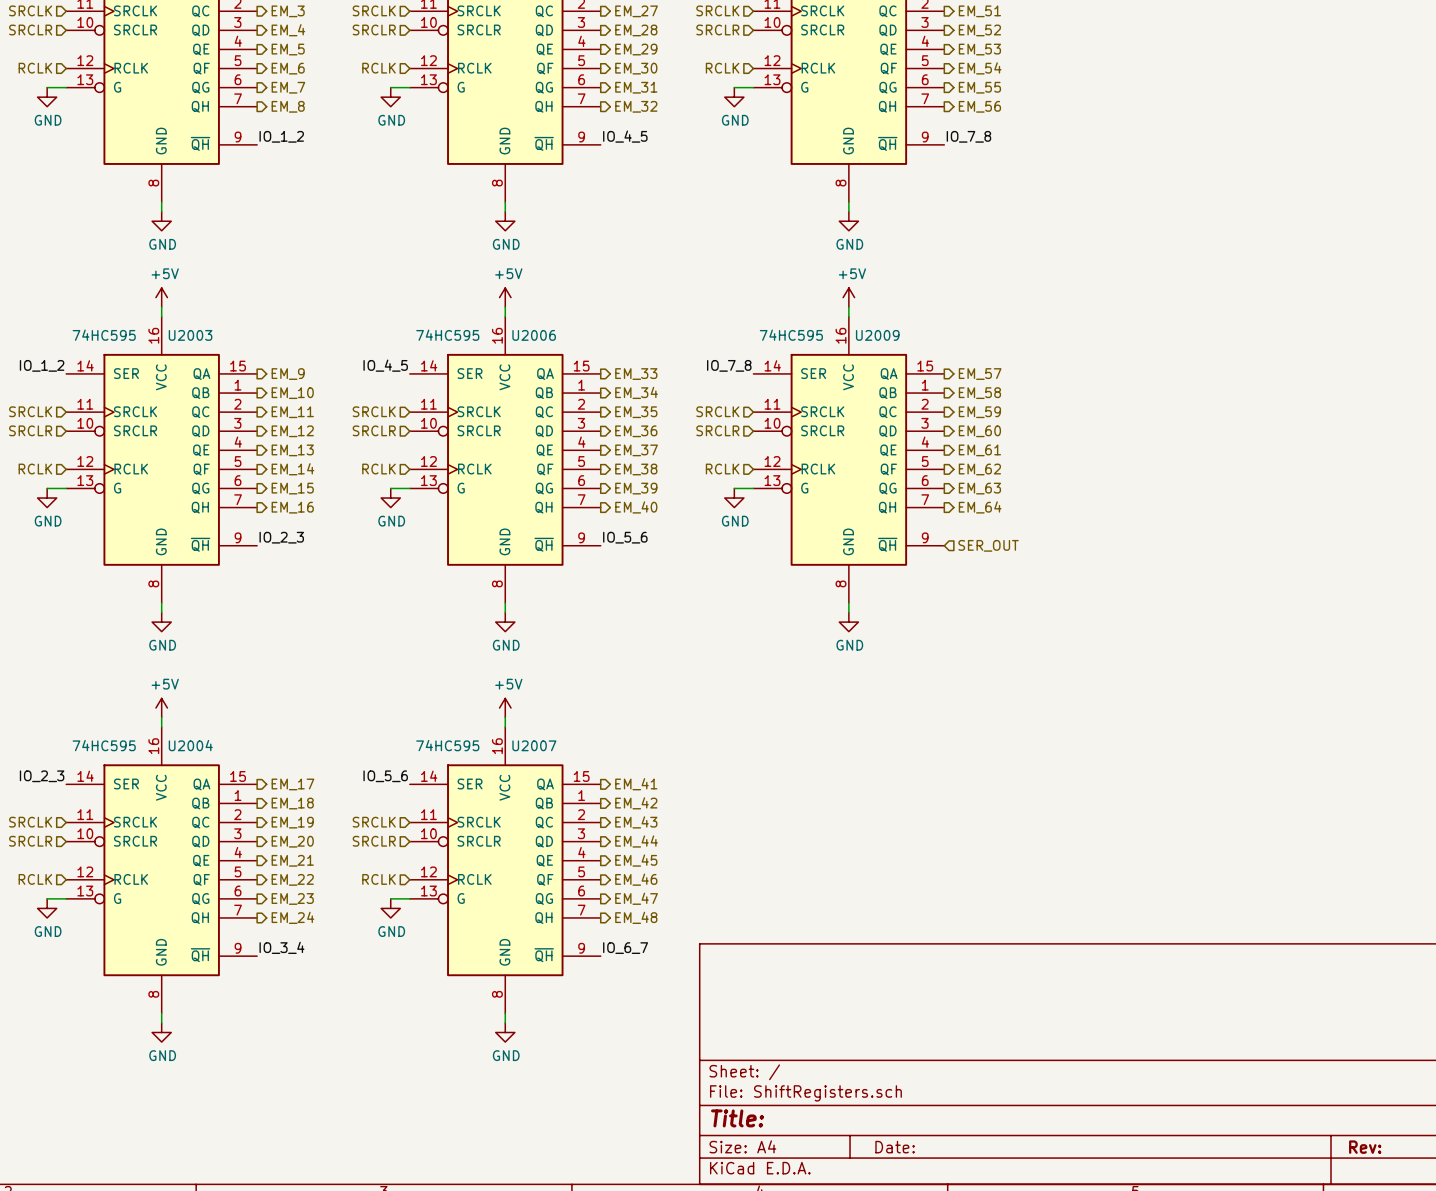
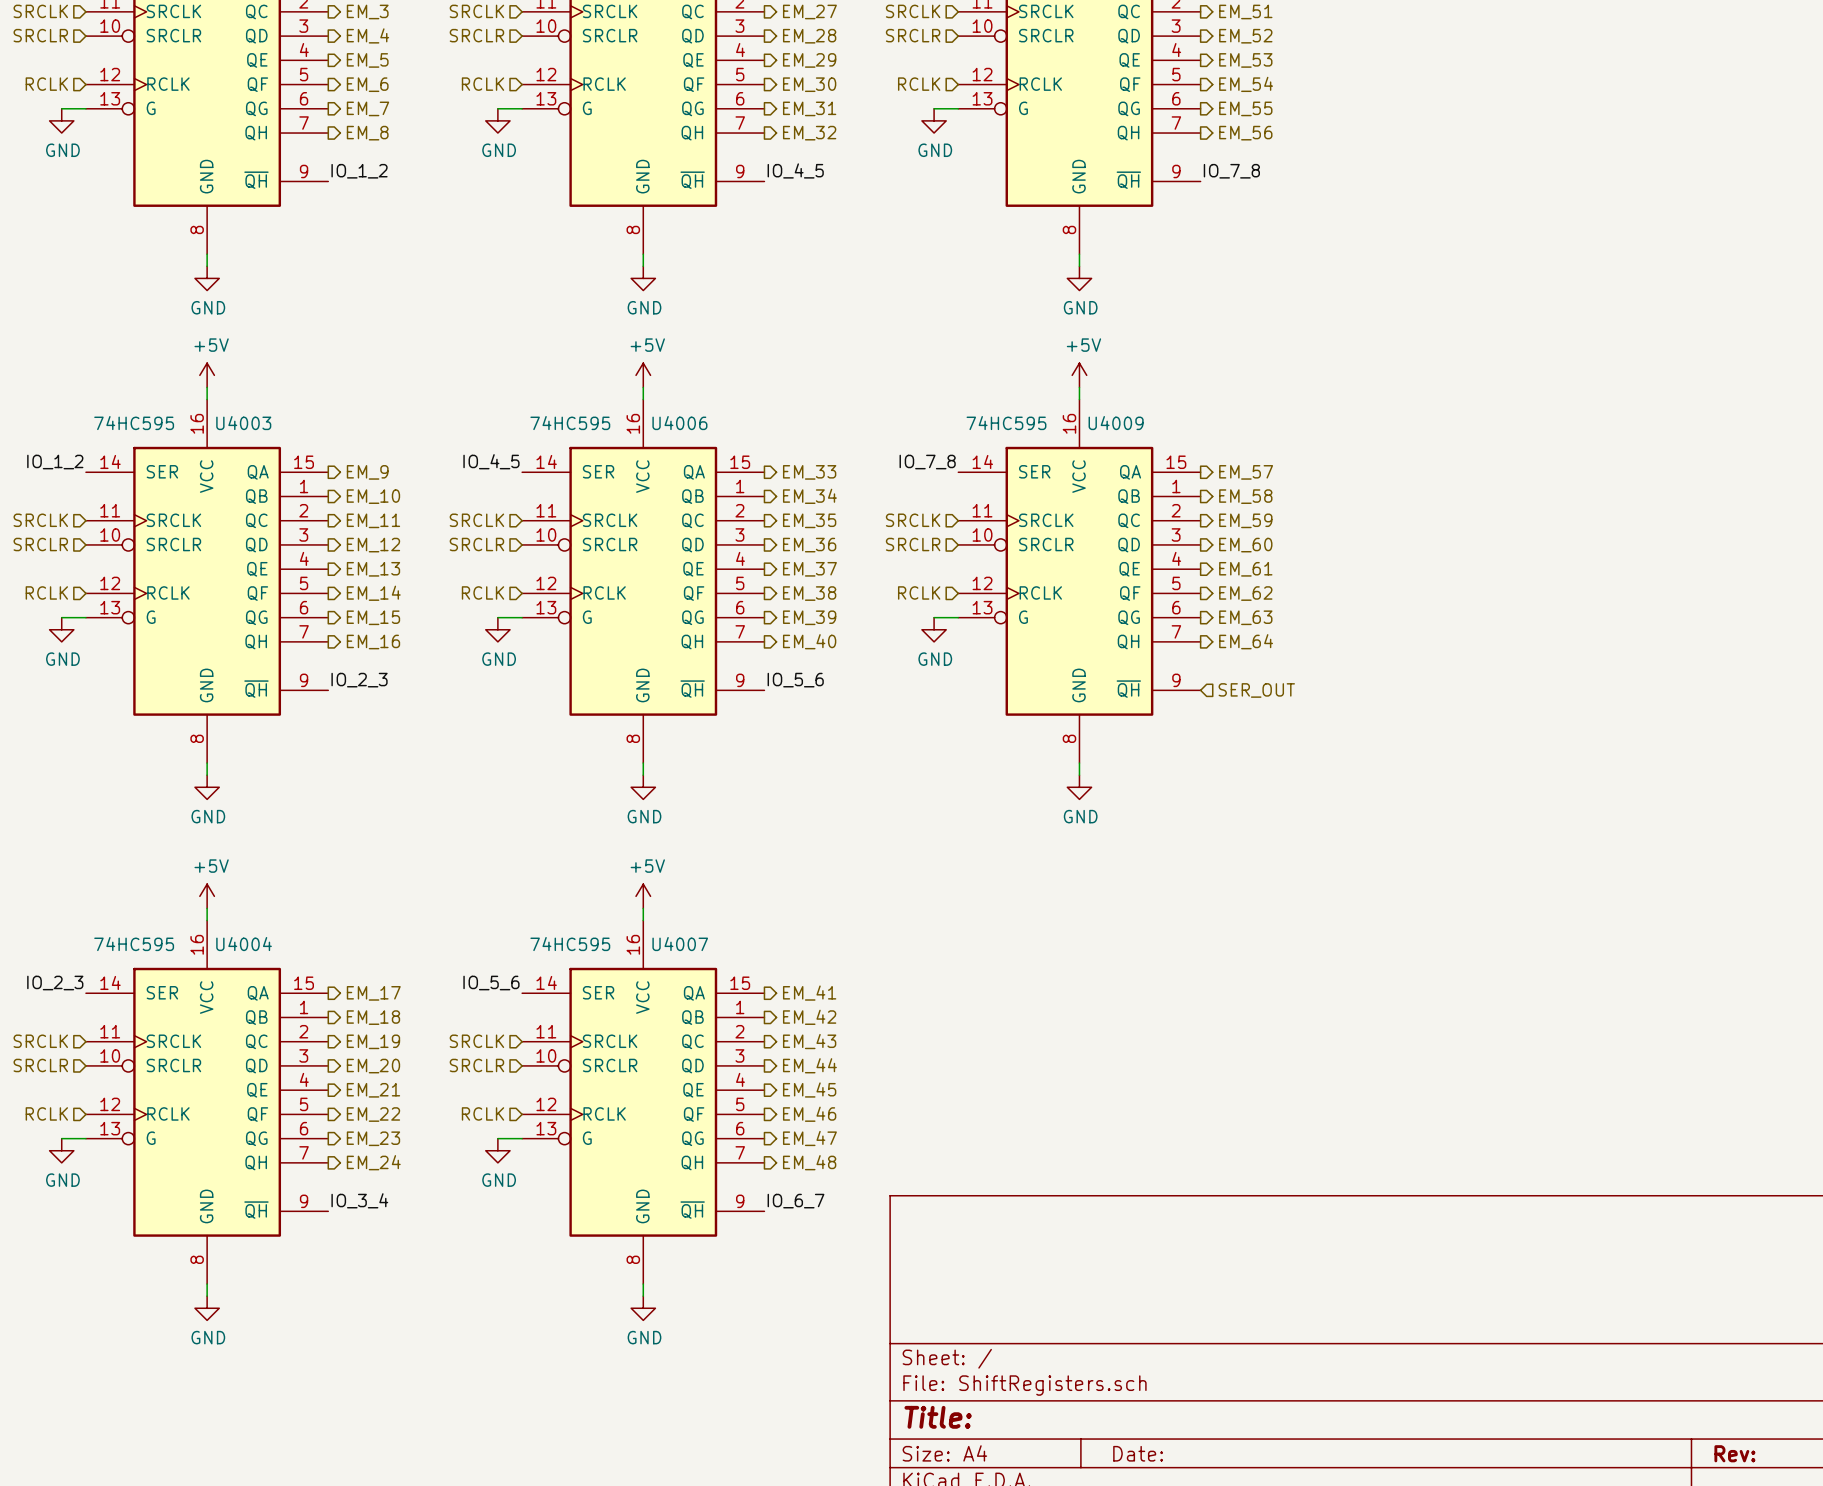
U2003 name: U2003 (190, 335) -> U4003 (243, 423)
U2006 name: U2006 (534, 335) -> U4006 (679, 423)
U2009 name: U2009 (877, 335) -> U4009 (1116, 423)
U2004 name: U2004 (190, 745) -> U4004 (244, 944)
U2007 name: U2007 (534, 745) -> U4007 (680, 944)

